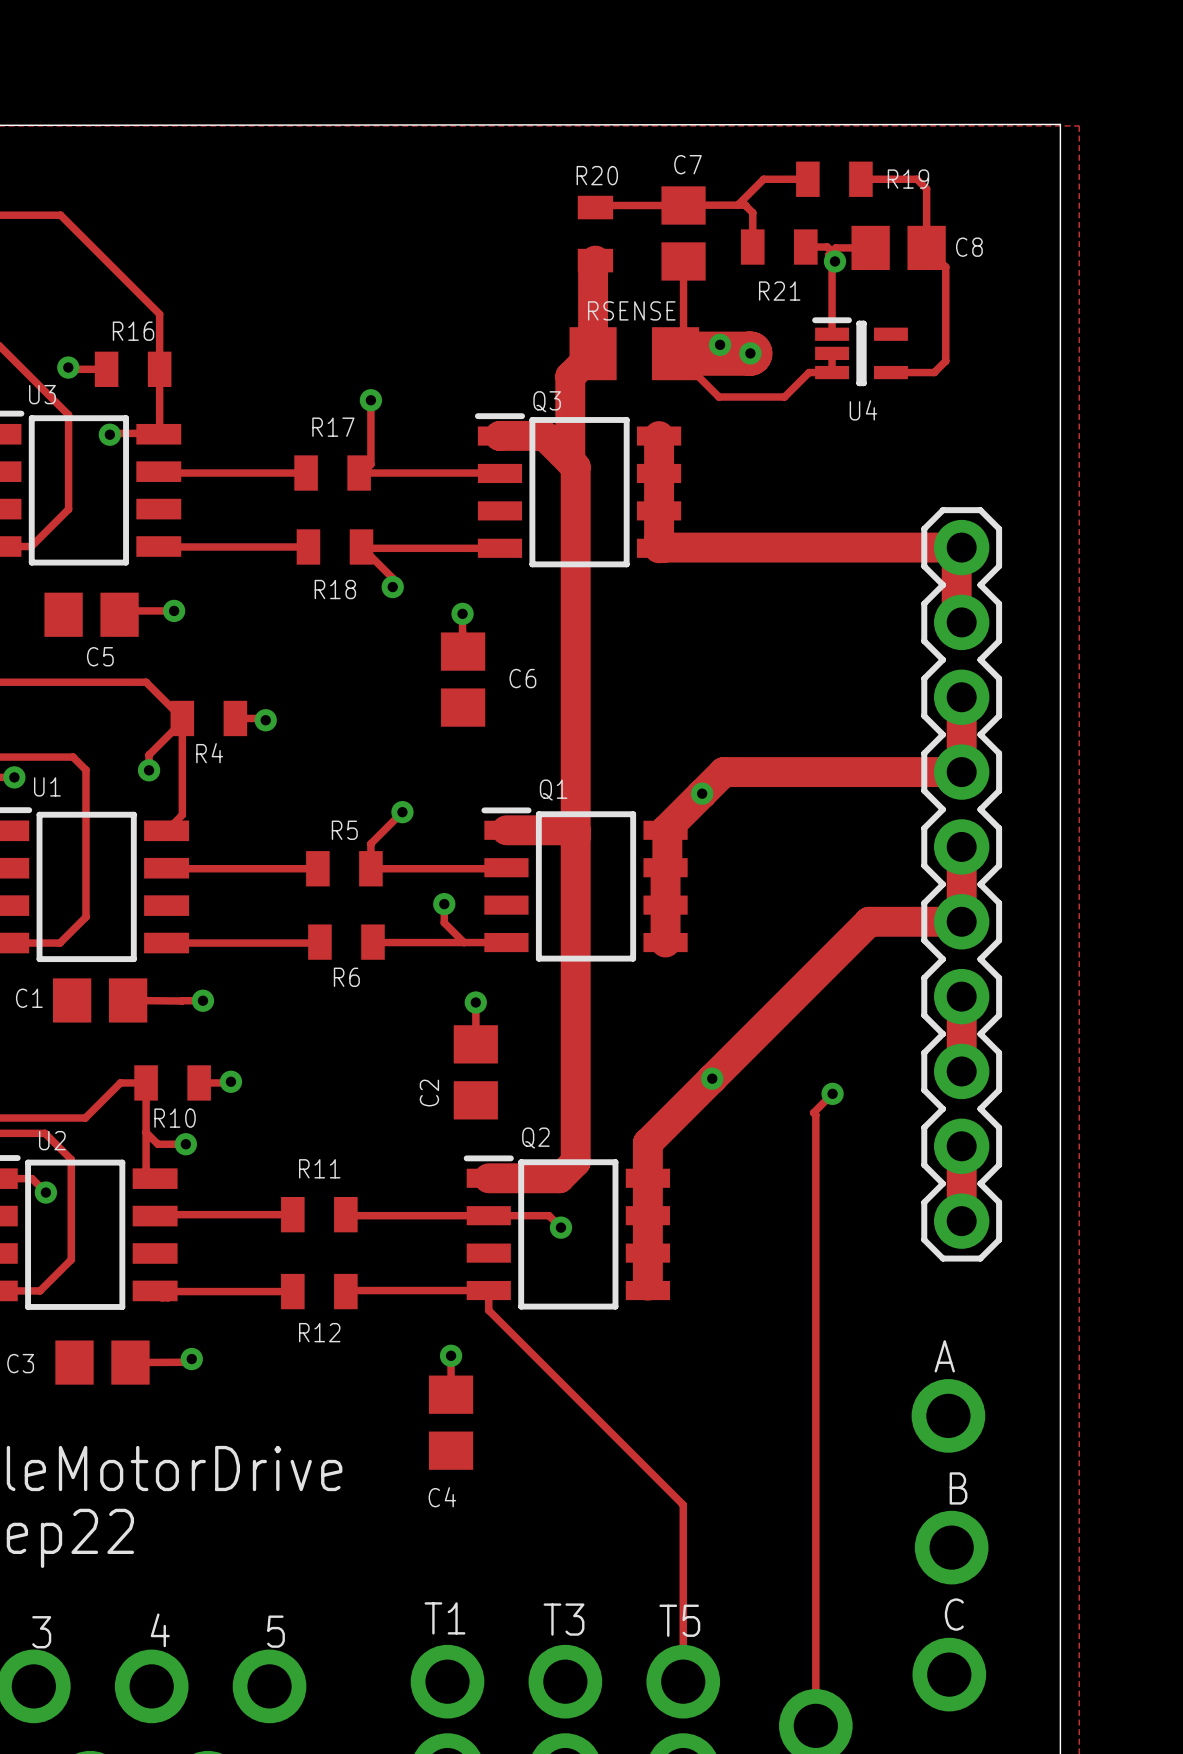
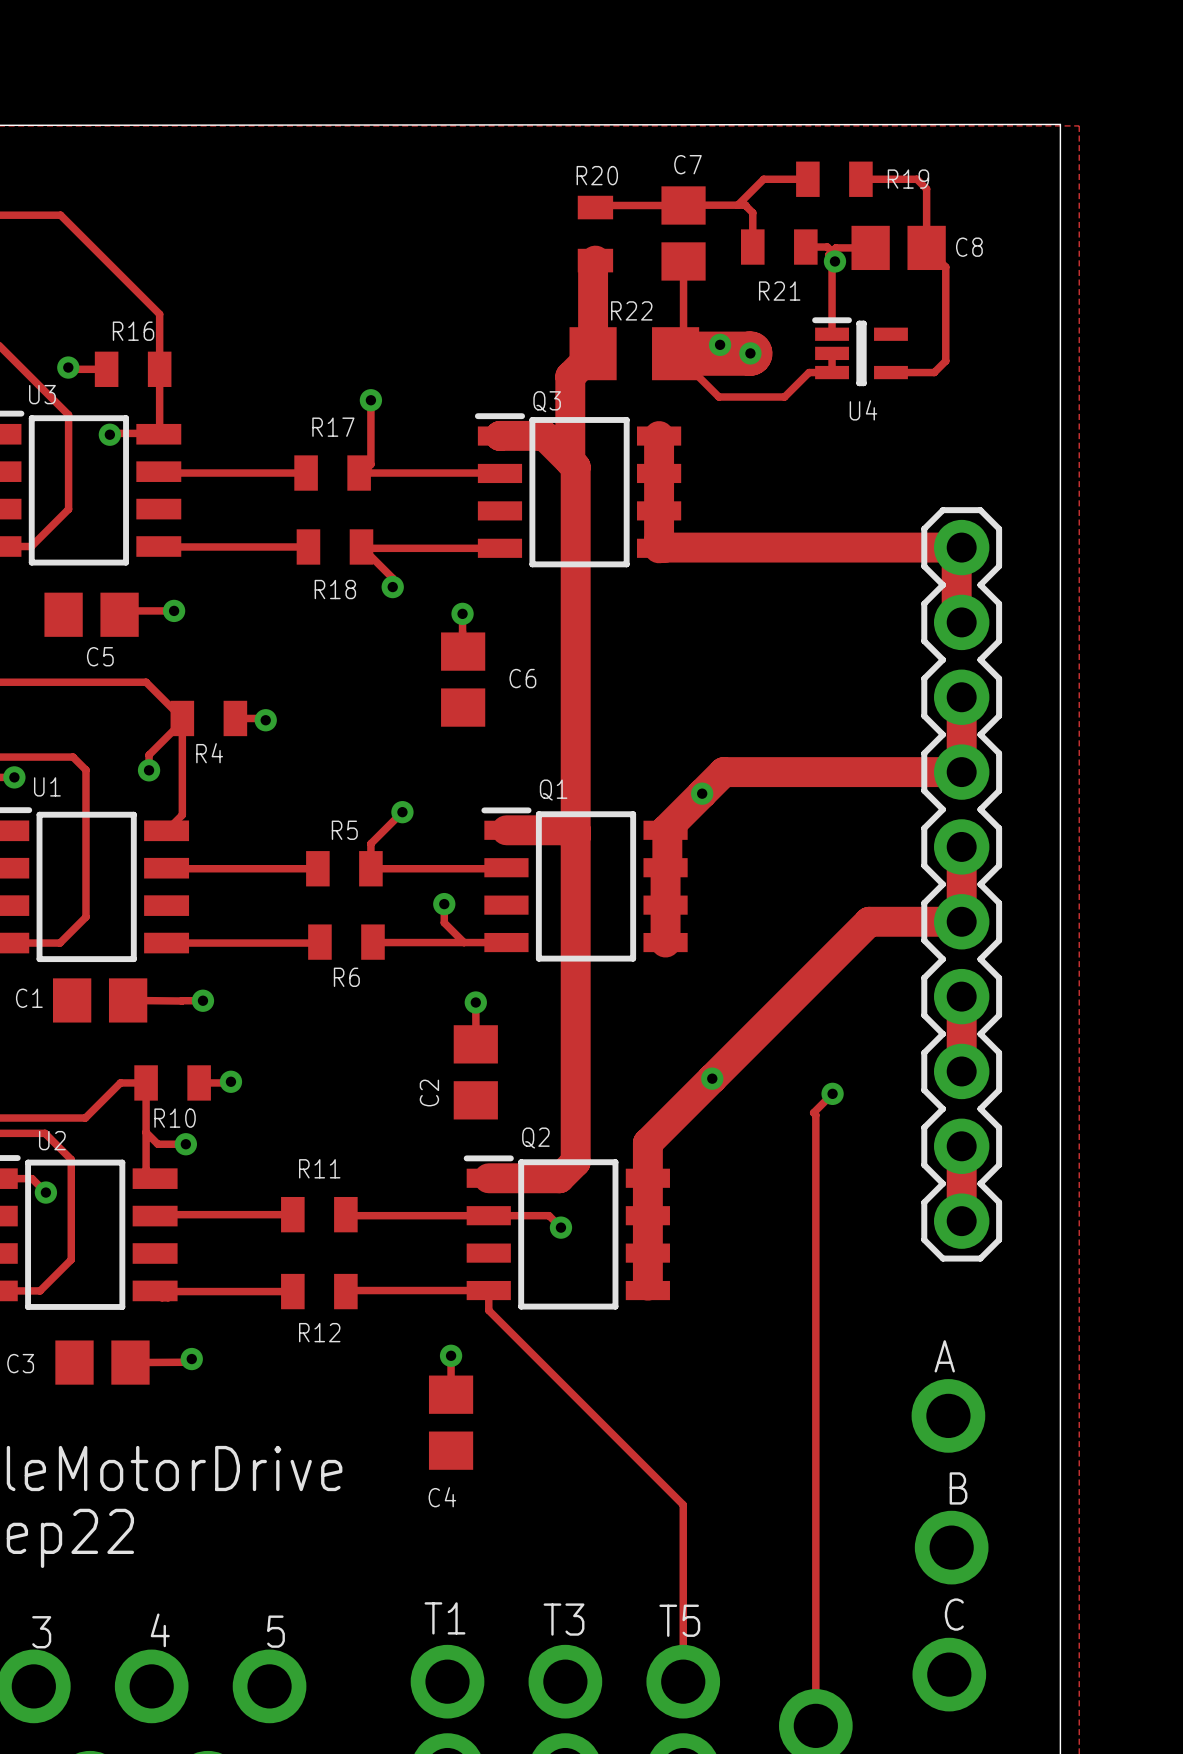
RSENSE name: RSENSE (631, 310) -> R22 (631, 310)

